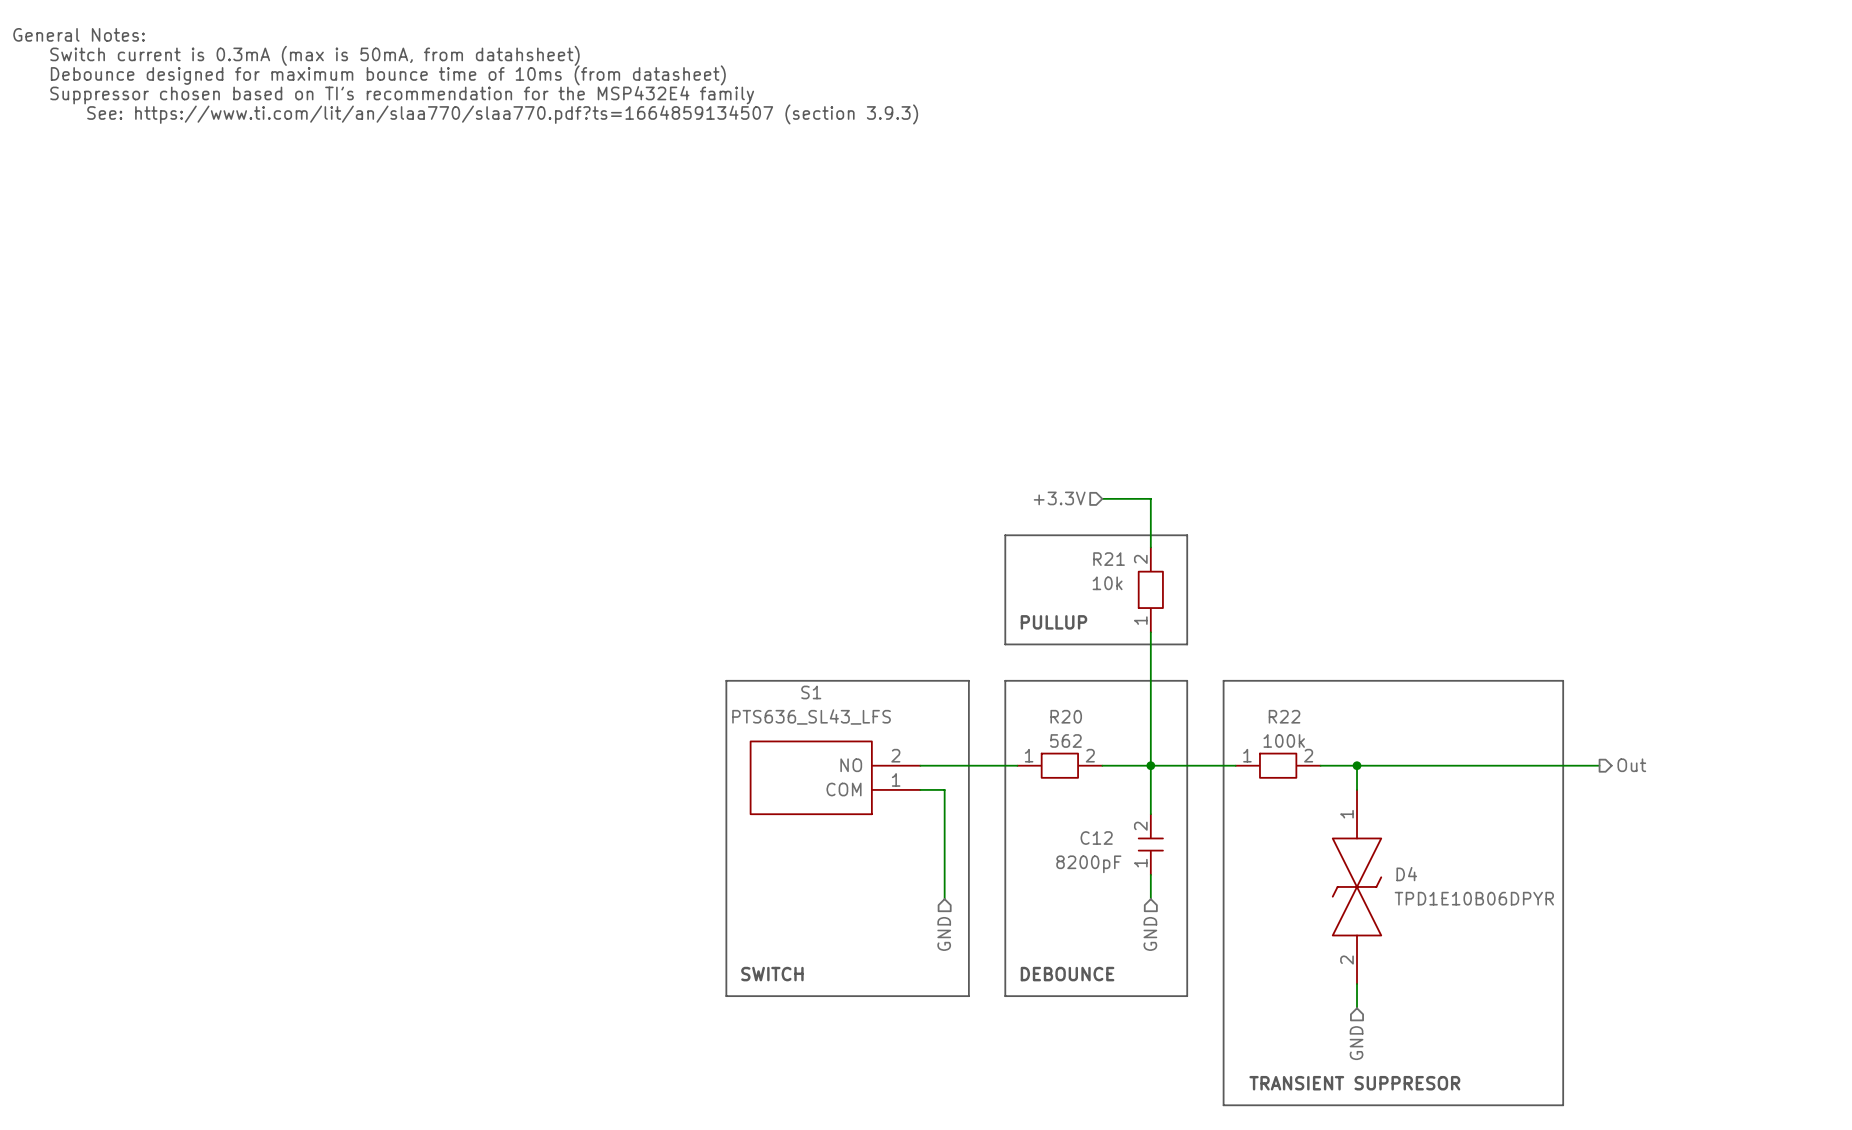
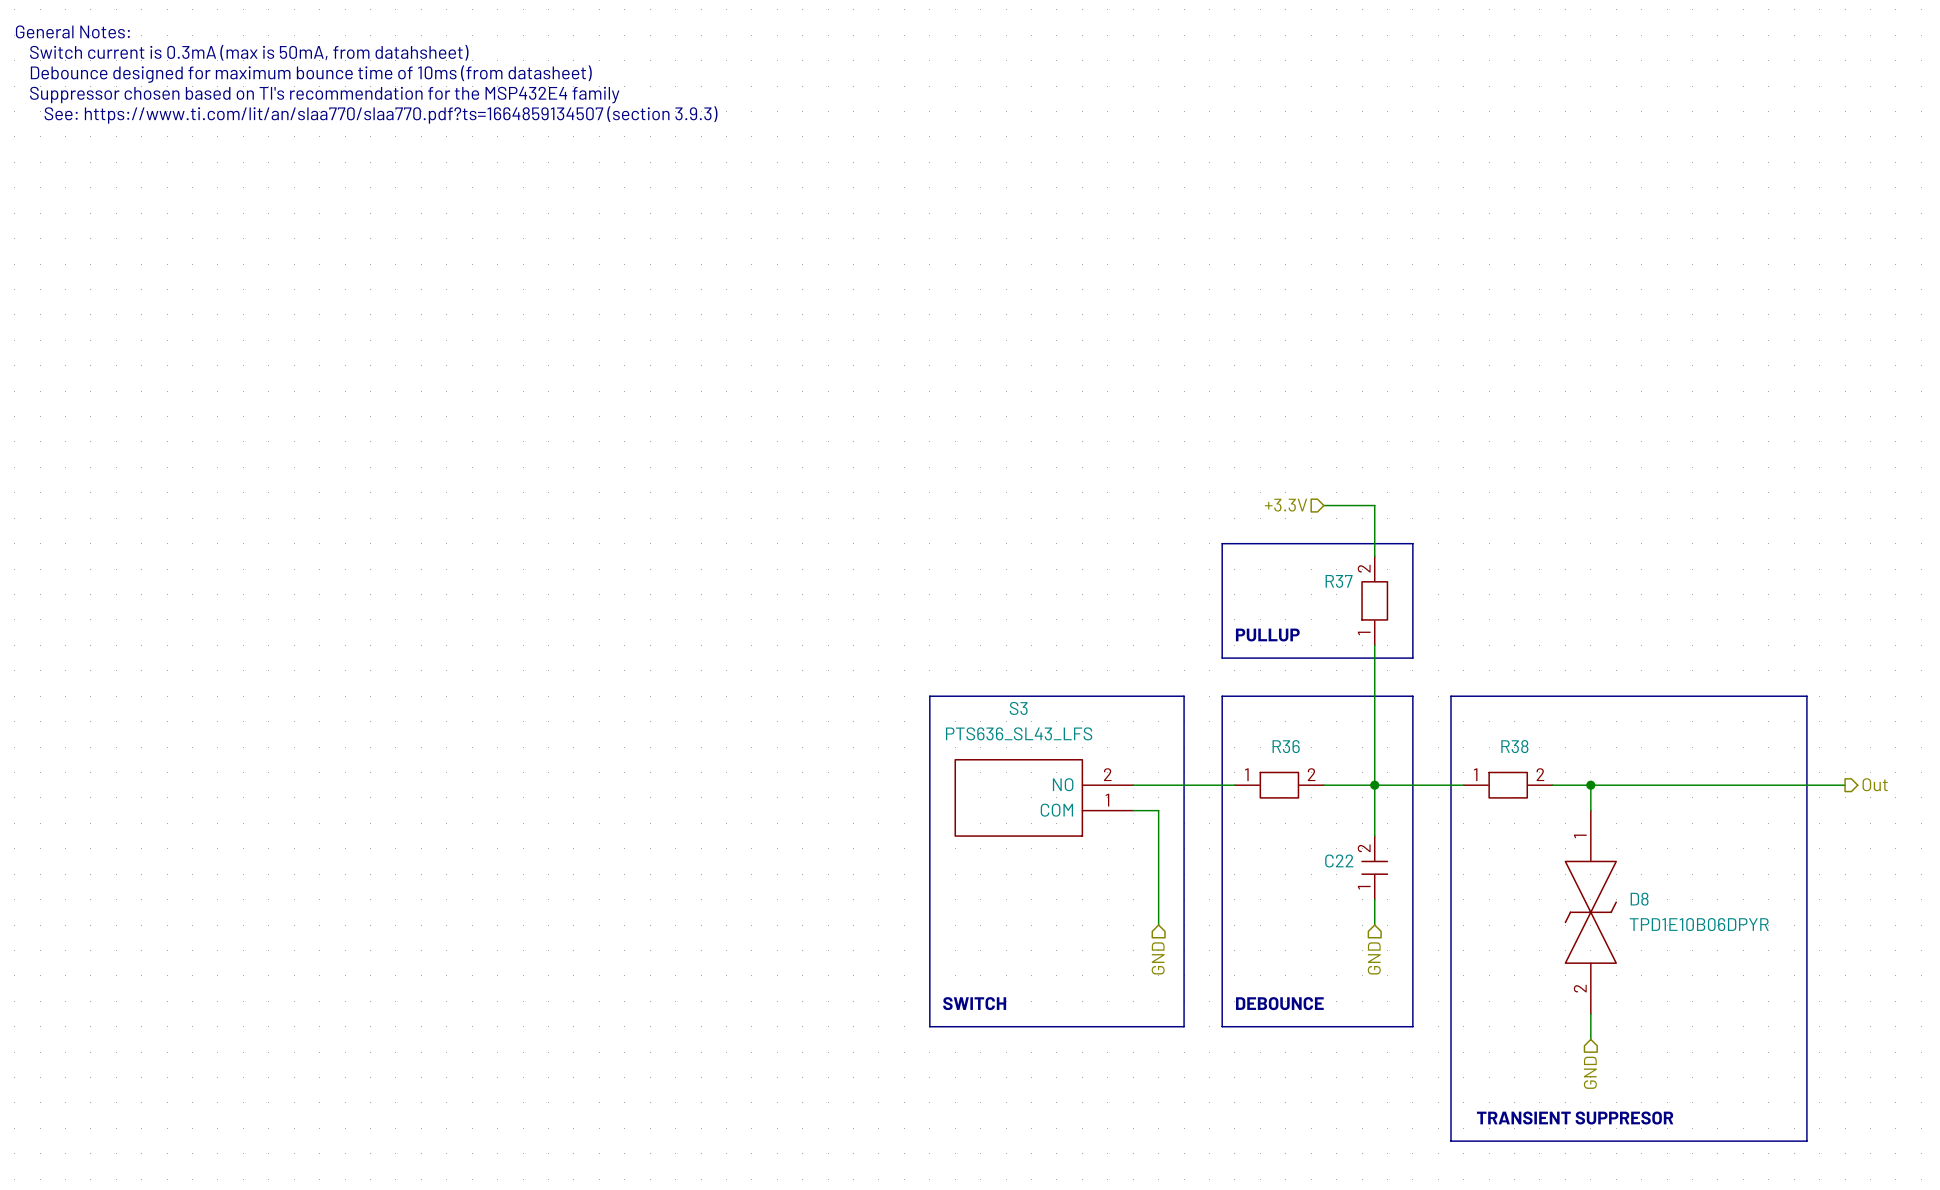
hierarchical label position: +3.3V (1059, 498) -> +3.3V (1286, 505)
wire: (1102, 498) (1150, 498) (1150, 547) -> (1323, 505) (1374, 505) (1374, 556)
line: (1005, 535) (1187, 535) (1187, 644) (1005, 644) (1005, 535) -> (1222, 543) (1412, 543) (1412, 658) (1222, 658) (1222, 543)
R37: none -> (1374, 600)
R21: 10k (1150, 589) -> none
text position: PULLUP (1053, 622) -> PULLUP (1267, 635)
wire: (1150, 632) (1150, 814) -> (1374, 645) (1374, 836)
line: (726, 680) (968, 680) (968, 996) (726, 996) (726, 680) -> (929, 696) (1184, 696) (1184, 1026) (929, 1026) (929, 696)
line: (1005, 680) (1187, 680) (1187, 996) (1005, 996) (1005, 680) -> (1222, 696) (1412, 696) (1412, 1026) (1222, 1026) (1222, 696)
line: (1223, 680) (1563, 680) (1563, 1105) (1223, 1105) (1223, 680) -> (1451, 696) (1806, 696) (1806, 1141) (1451, 1141) (1451, 696)
R36: none -> (1279, 785)
R38: none -> (1508, 785)
junction: none -> (1590, 785)
wire: (920, 765) (1017, 765) -> (1133, 785) (1234, 785)
S3: none -> PTS636_SL43_LFS (1043, 797)
R20: 562 (1059, 765) -> none
wire: (1102, 765) (1235, 765) -> (1323, 785) (1463, 785)
junction: (1150, 765) -> none
R22: 100k (1278, 765) -> none
wire: (1320, 765) (1599, 765) -> (1552, 785) (1845, 785)
wire: (1357, 765) (1357, 789) -> (1590, 785) (1590, 810)
junction position: (1357, 765) -> (1374, 785)
hierarchical label position: Out (1631, 765) -> Out (1875, 784)
S1: PTS636_SL43_LFS (835, 777) -> none
wire: (920, 789) (944, 789) (944, 899) -> (1133, 810) (1158, 810) (1158, 925)
C22: none -> (1374, 867)
C12: 8200pF (1150, 844) -> none
wire: (1150, 874) (1150, 899) -> (1374, 899) (1374, 925)
D8: none -> TPD1E10B06DPYR (1590, 912)
D4: TPD1E10B06DPYR (1357, 886) -> none
hierarchical label: none -> GND (1374, 958)
hierarchical label: GND (944, 933) -> none
hierarchical label position: GND (1150, 933) -> GND (1158, 958)
text position: SWITCH (772, 974) -> SWITCH (974, 1003)
text position: DEBOUNCE (1067, 974) -> DEBOUNCE (1279, 1003)
wire: (1357, 984) (1357, 1008) -> (1590, 1014) (1590, 1039)
hierarchical label: none -> GND (1590, 1072)
hierarchical label: GND (1356, 1043) -> none
text position: TRANSIENT SUPPRESOR (1354, 1083) -> TRANSIENT SUPPRESOR (1575, 1118)

